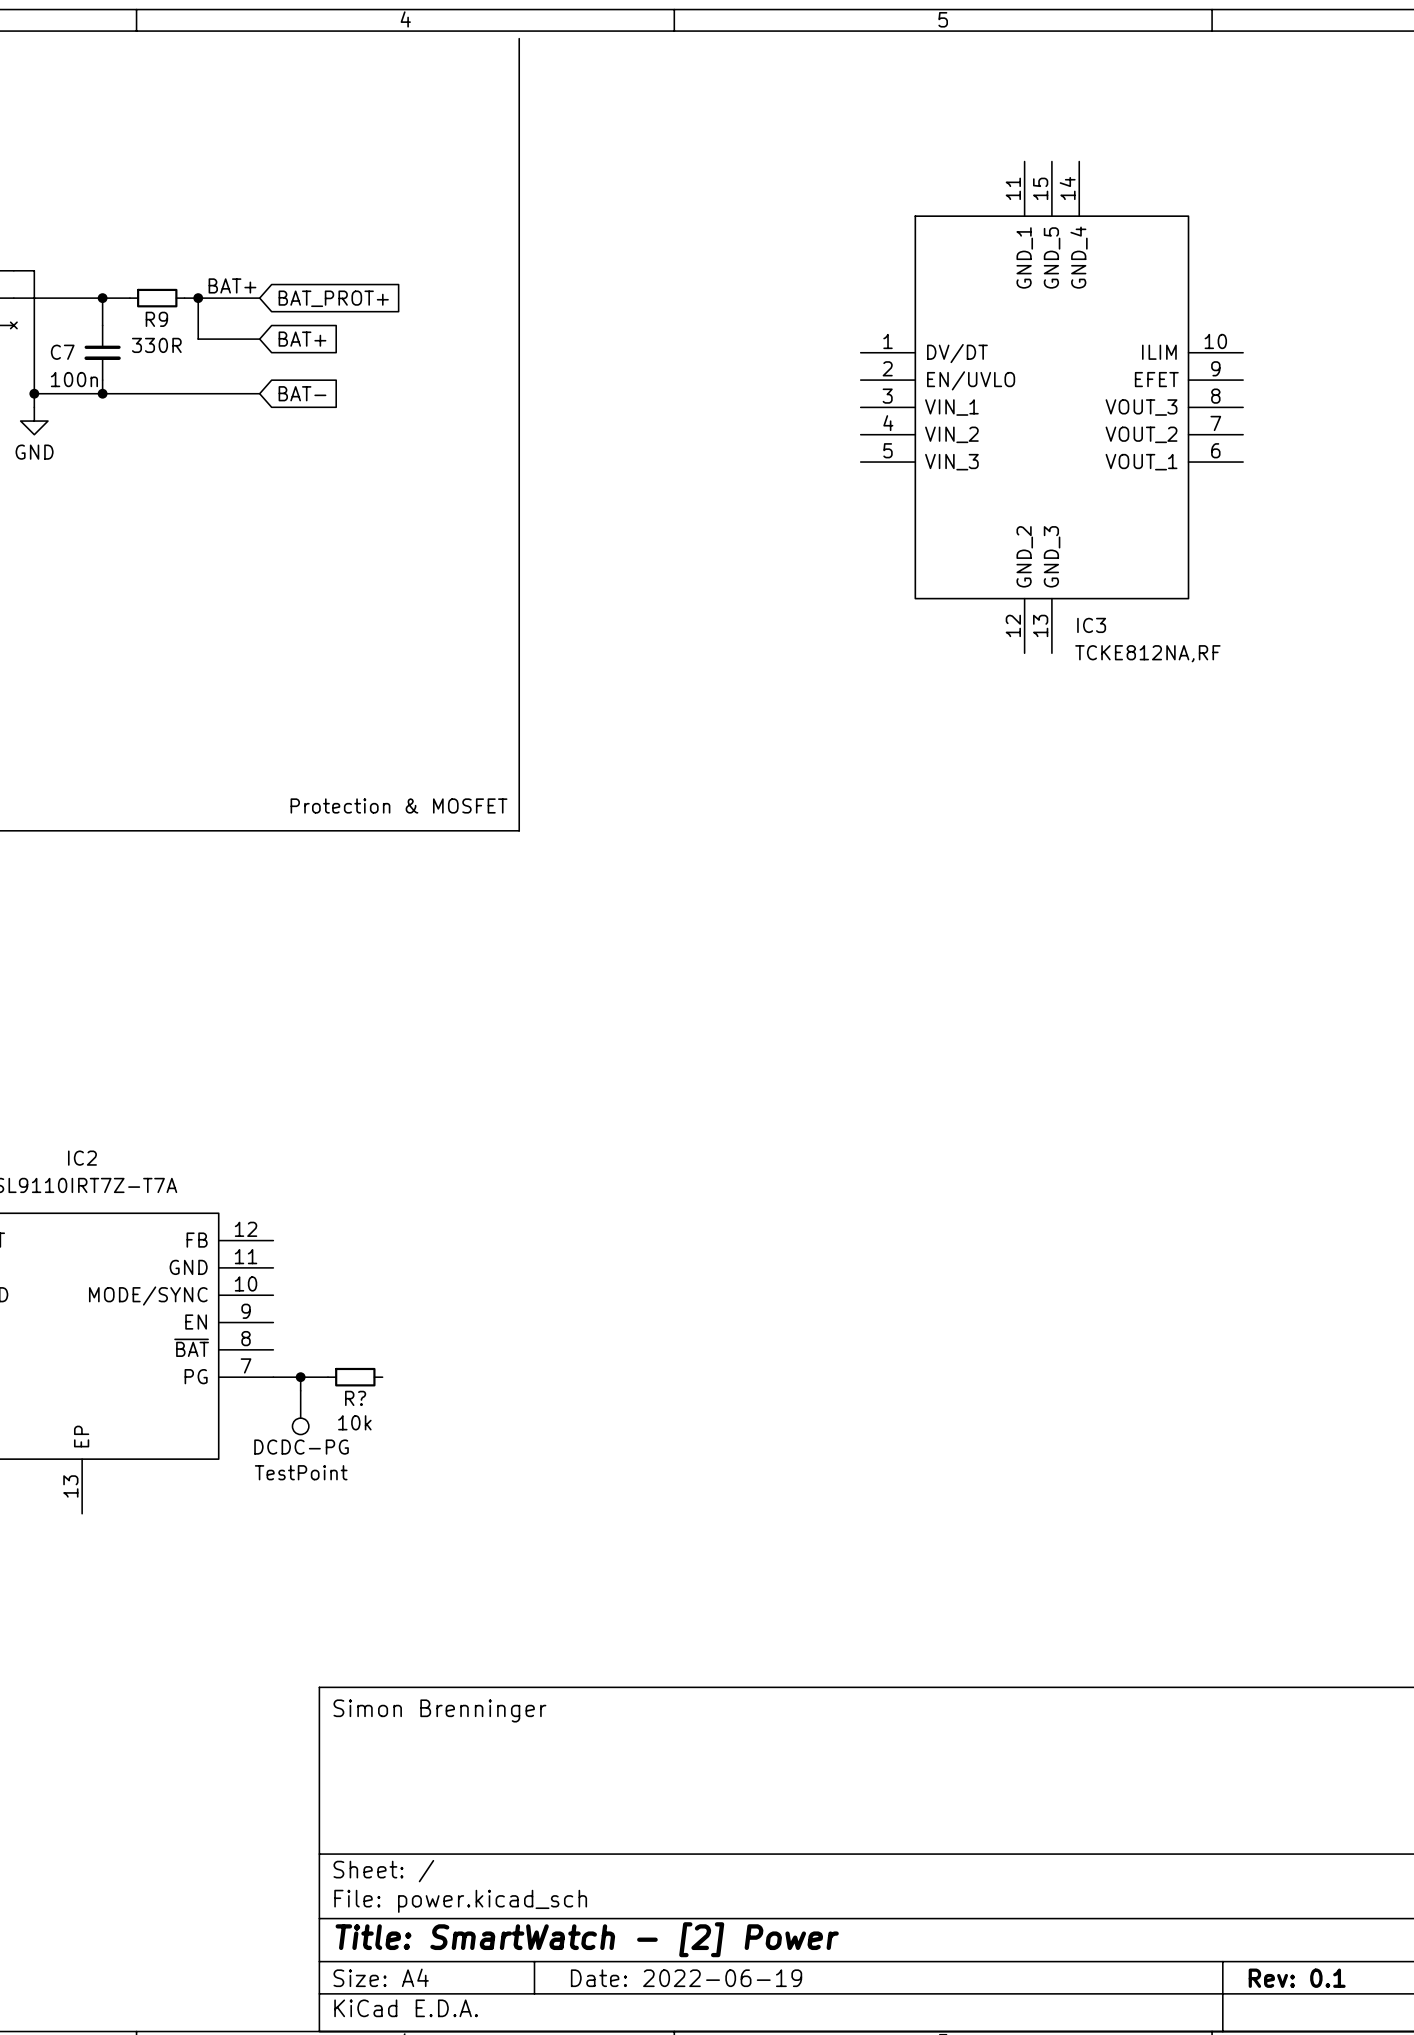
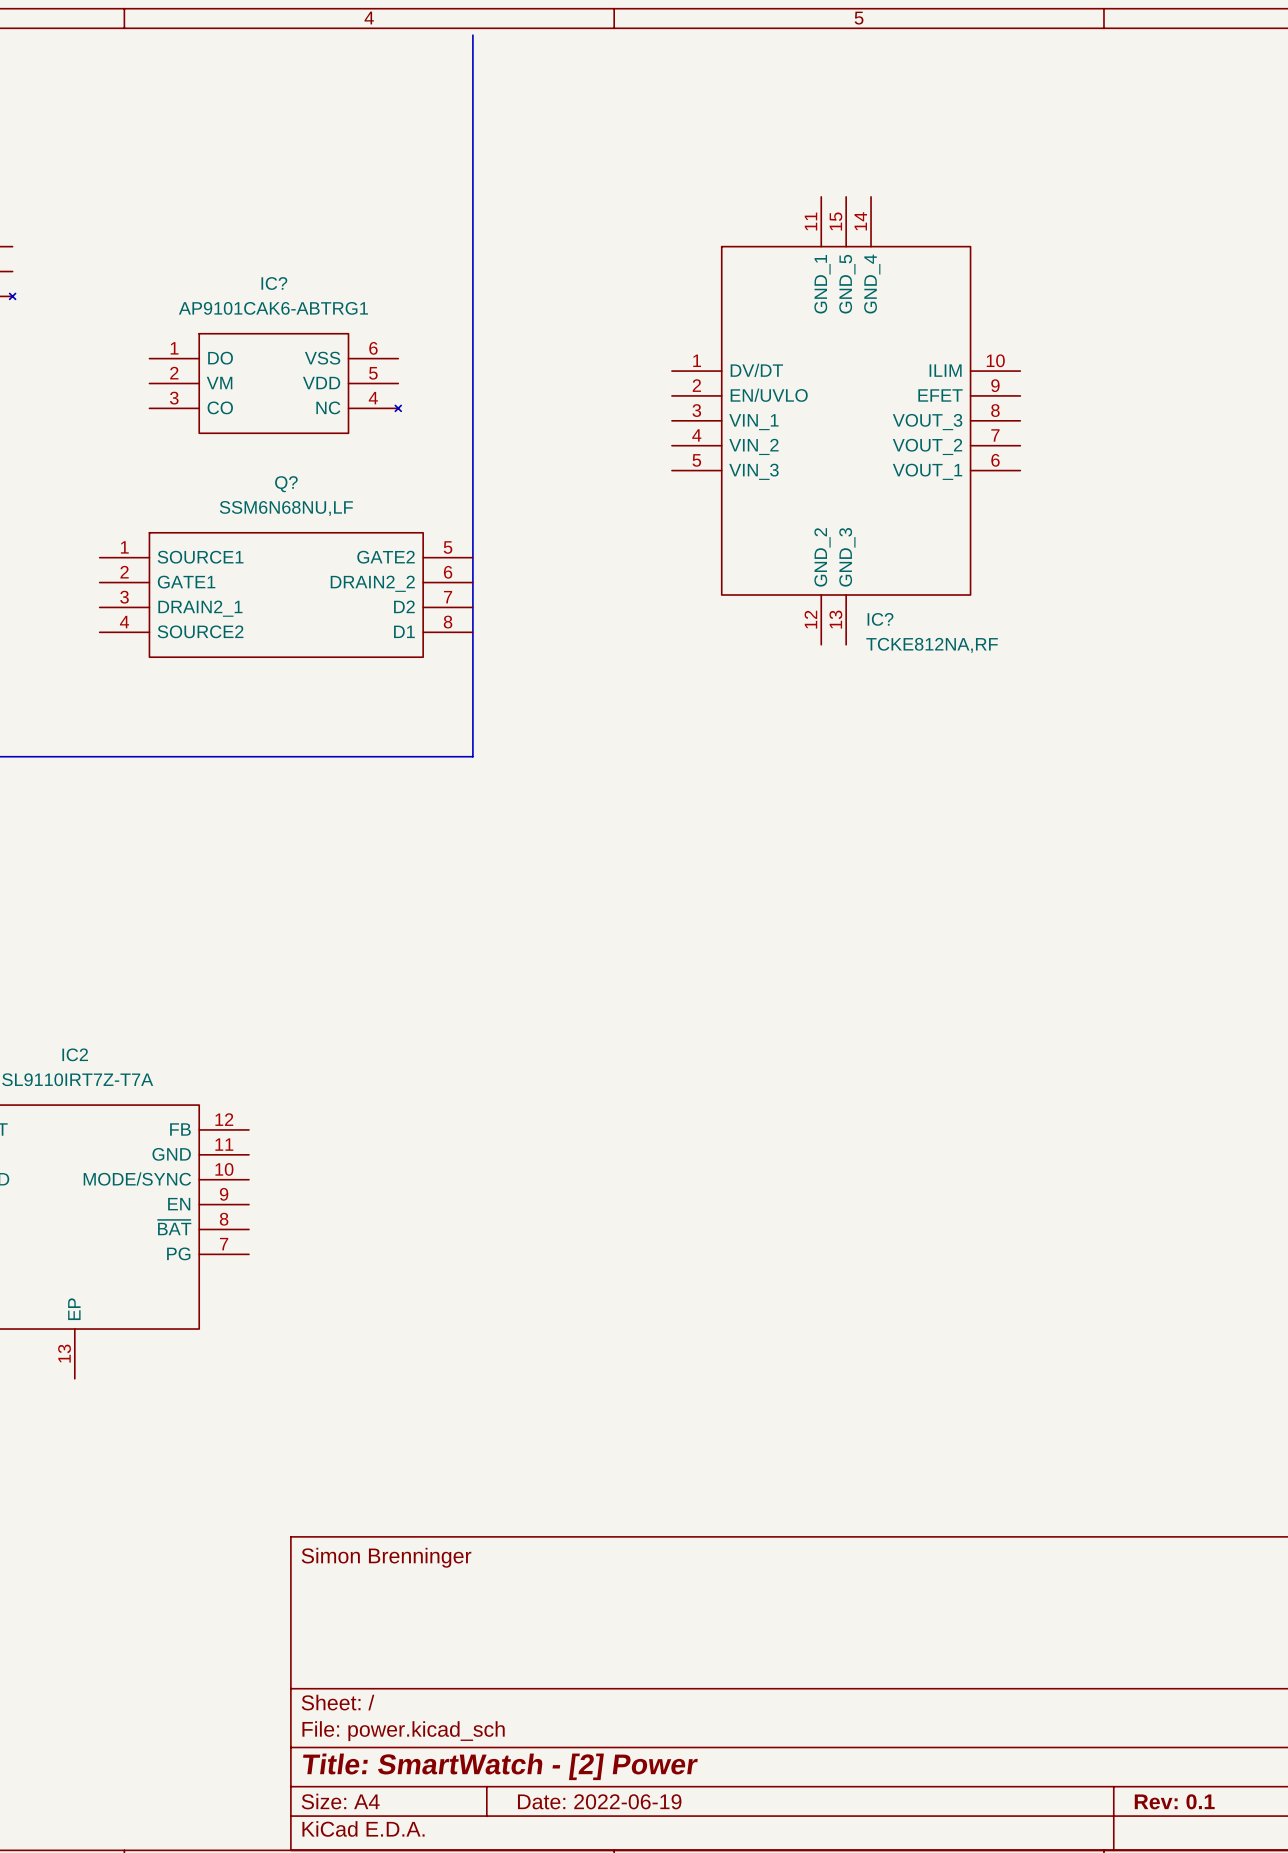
wire: (13, 270) (34, 270) (34, 407) -> none
label: BAT+ (232, 285) -> none
wire: (13, 298) (129, 298) -> none
wire: (102, 298) (102, 325) -> none
junction: (102, 298) -> none
R9: 330R (157, 298) -> none
wire: (184, 298) (259, 298) -> none
wire: (198, 298) (198, 339) (259, 339) -> none
junction: (198, 298) -> none
global label: BAT_PROT+ (333, 298) -> none
global label: BAT+ (302, 339) -> none
C7: 100n (102, 352) -> none
wire: (102, 380) (102, 393) -> none
wire: (34, 393) (259, 393) -> none
junction: (34, 393) -> none
junction: (102, 393) -> none
global label: BAT- (302, 393) -> none
IC3: TCKE812NA,RF (1051, 407) -> none
power symbol: GND (34, 421) -> none
IC?: none -> AP9101CAK6-ABTRG1 (275, 383)
IC?: none -> TCKE812NA,RF (846, 420)
Q?: none -> SSM6N68NU,LF (286, 594)
text: Protection & MOSFET (398, 805) -> none
wire: (273, 1377) (327, 1377) -> none
wire: (300, 1377) (300, 1390) -> none
junction: (300, 1377) -> none
R?: 10k (355, 1377) -> none
DCDC-PG: TestPoint (300, 1412) -> none

